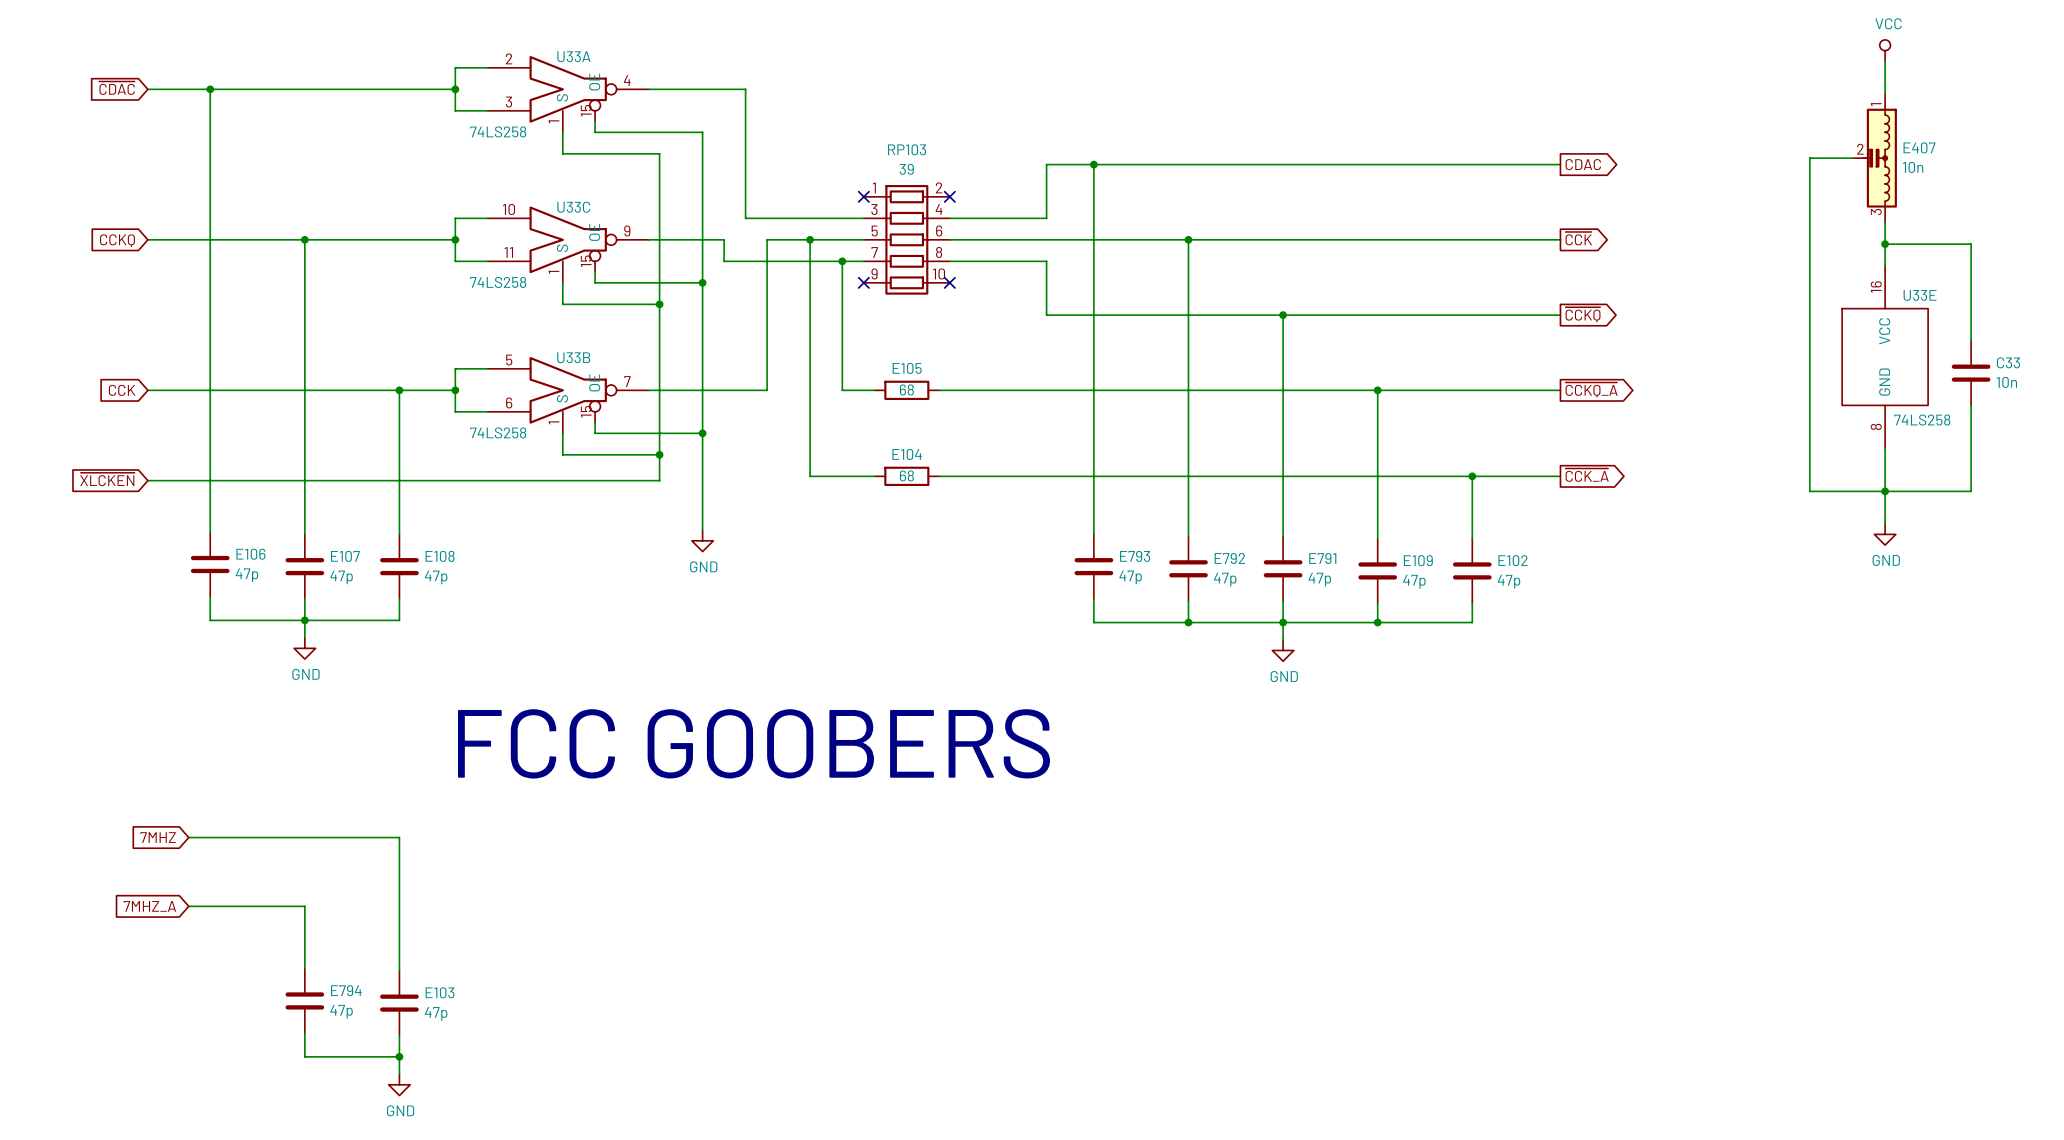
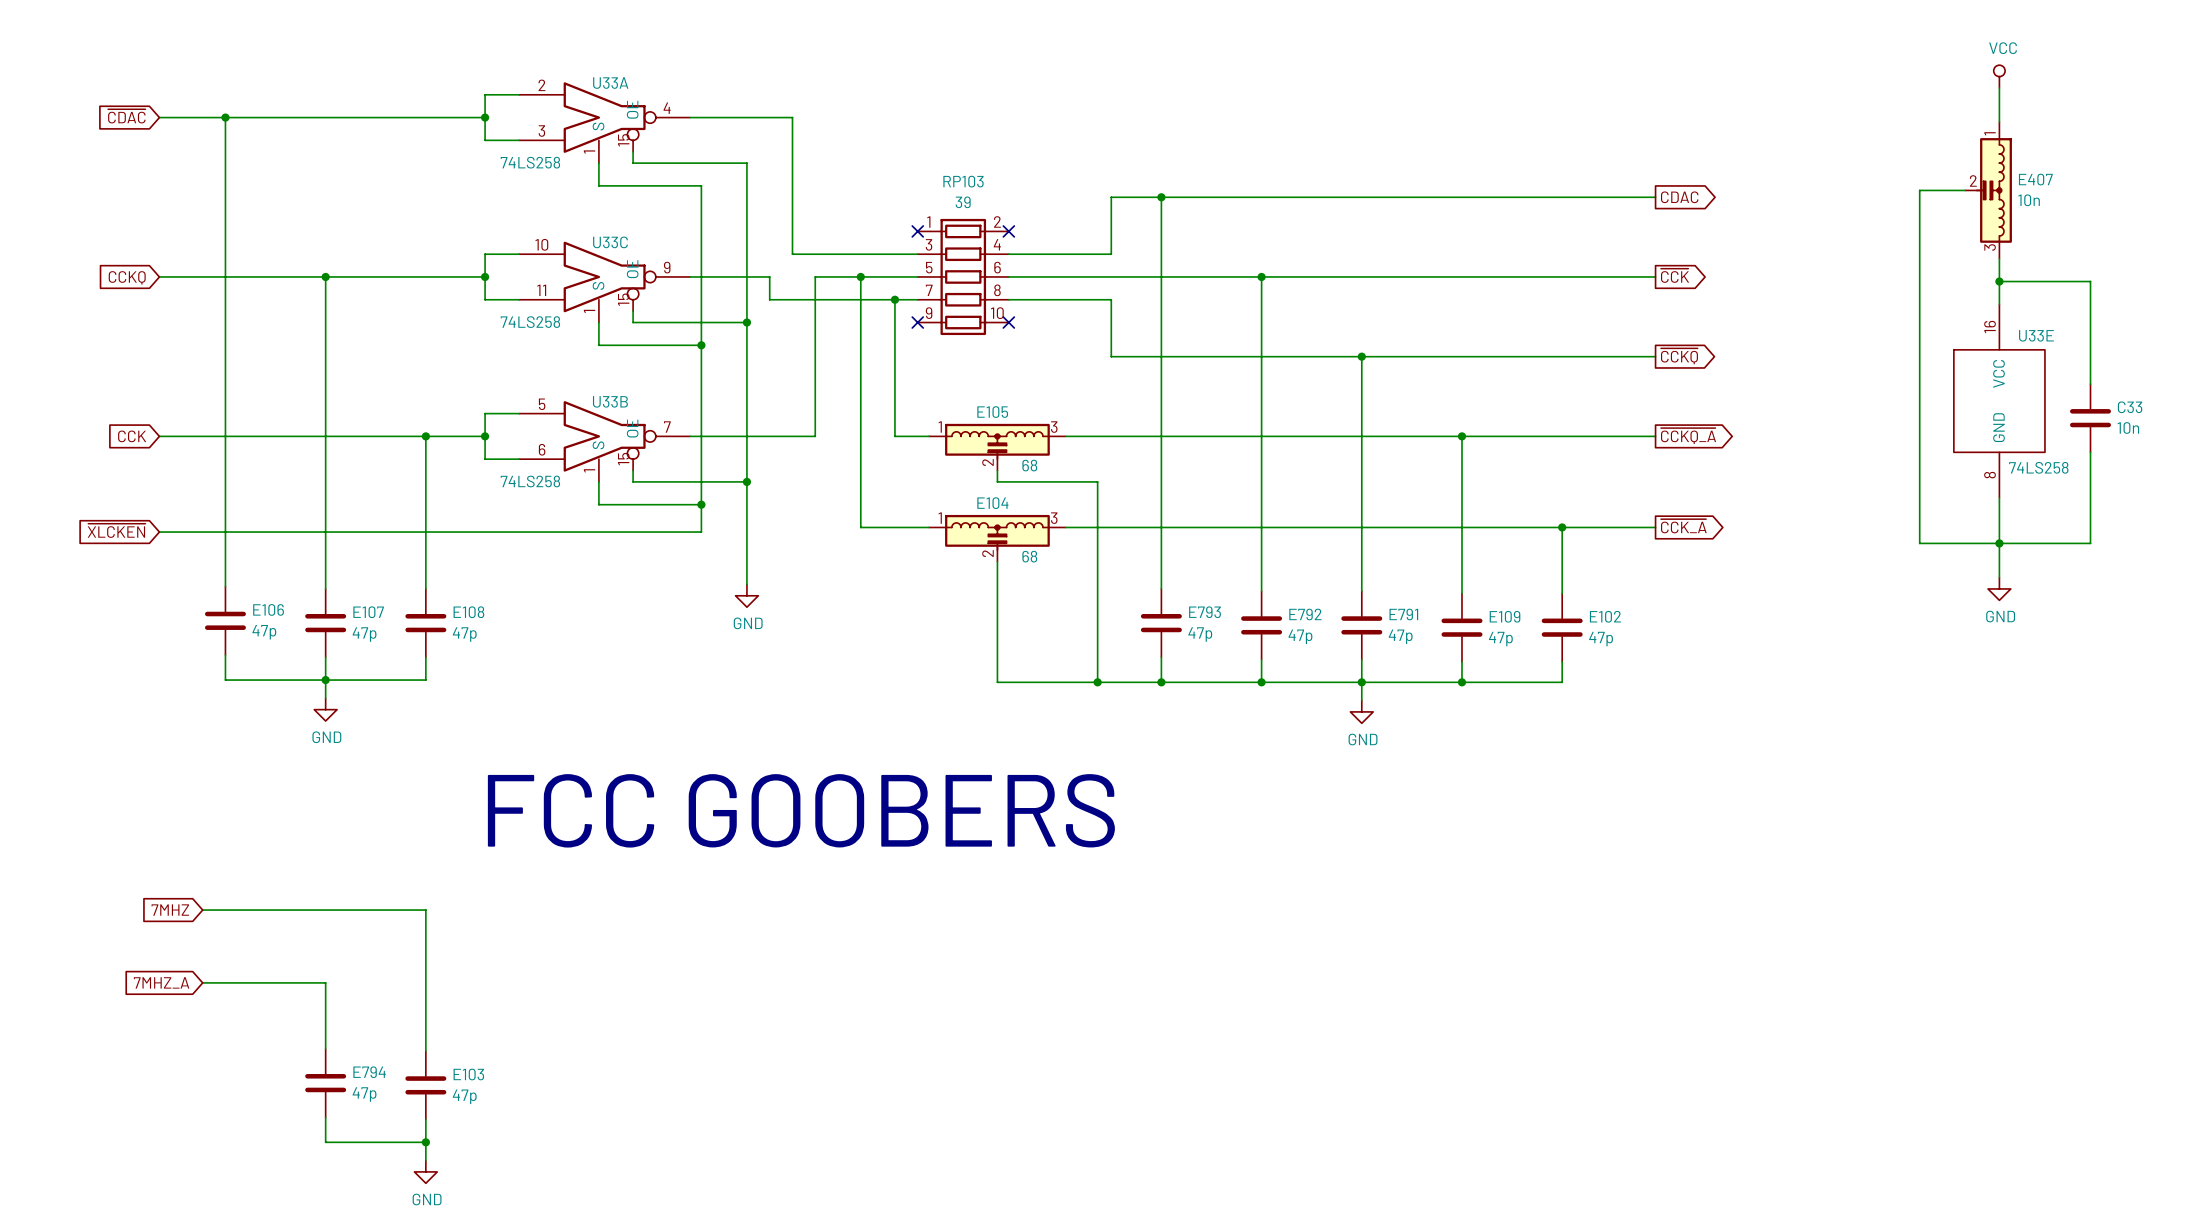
E105 symbol: [874, 380, 940, 401] -> [929, 423, 1066, 471]
E105 value position: 68 (906, 389) -> 68 (1029, 465)
wire: none -> (997, 470) (997, 481) (1097, 481) (1097, 682)
E104 symbol: [874, 466, 940, 487] -> [929, 514, 1066, 562]
E104 value position: 68 (906, 475) -> 68 (1029, 556)
wire: none -> (997, 561) (997, 682) (1161, 682)
junction: none -> (1097, 682)
junction: none -> (1161, 682)

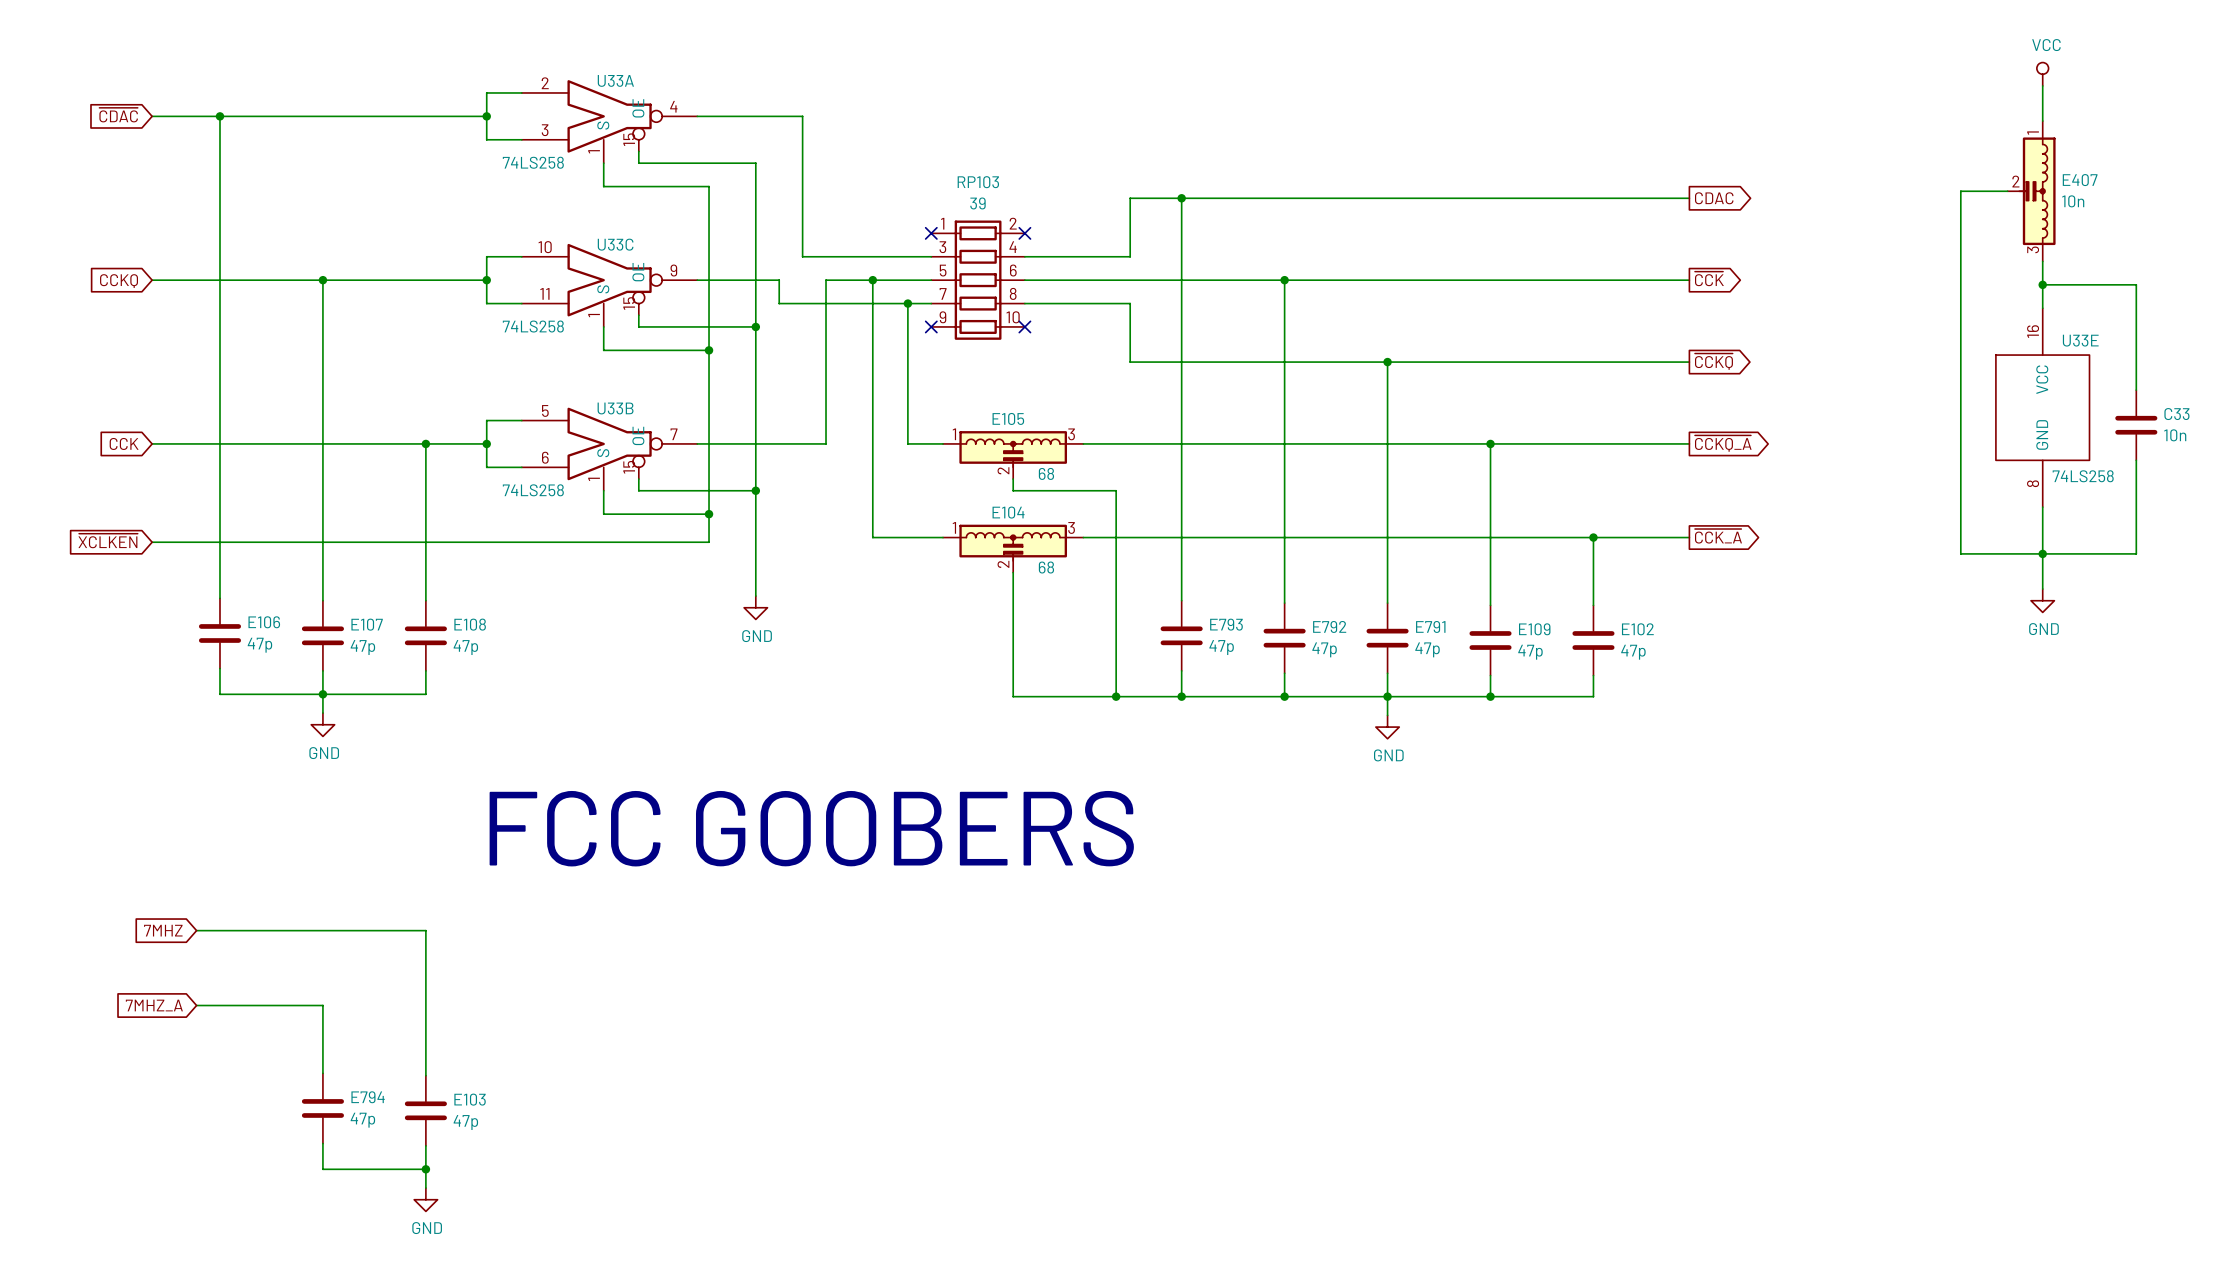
global label: ~{XLCKEN} (116, 530) -> ~{XCLKEN} (108, 540)

